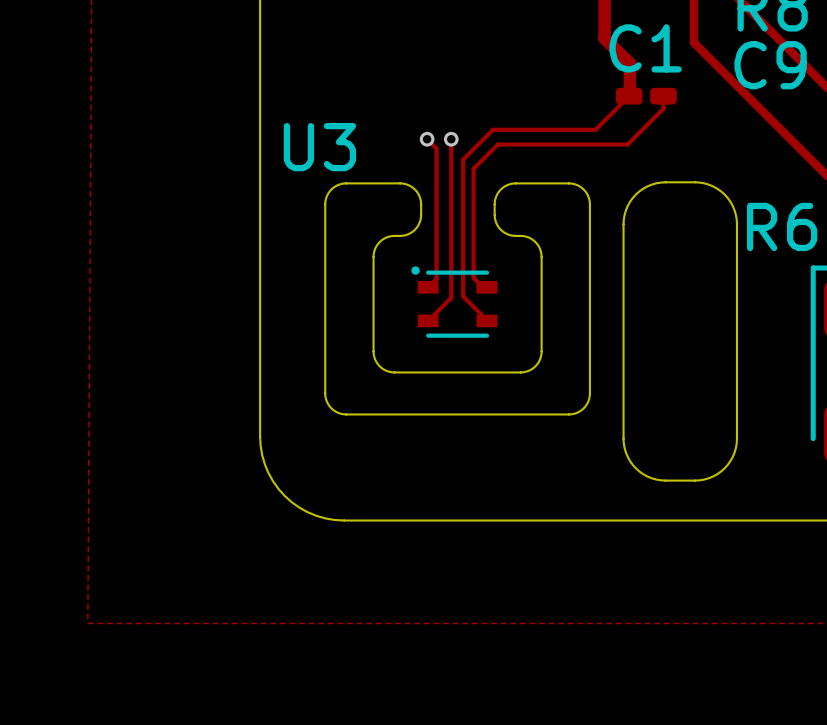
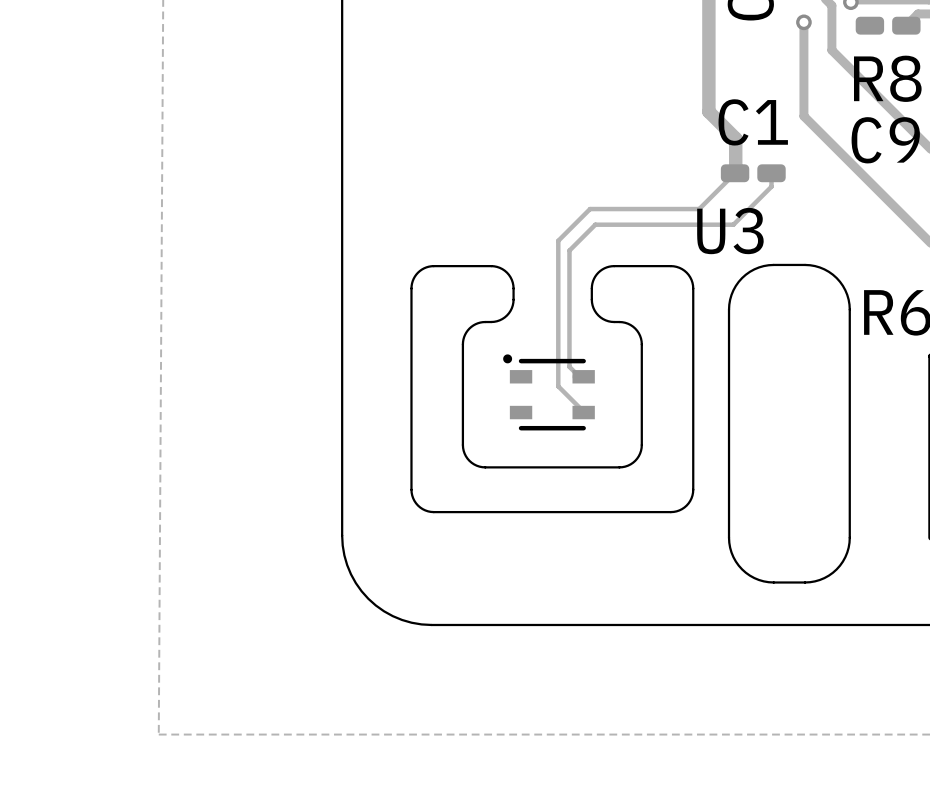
track: (427, 139) (436, 148) (436, 278) (428, 287) -> none
via: (427, 139) -> none
track: (451, 139) (451, 297) (428, 320) -> none
via: (451, 139) -> none
U3 name position: U3 (319, 147) -> U3 (730, 231)

